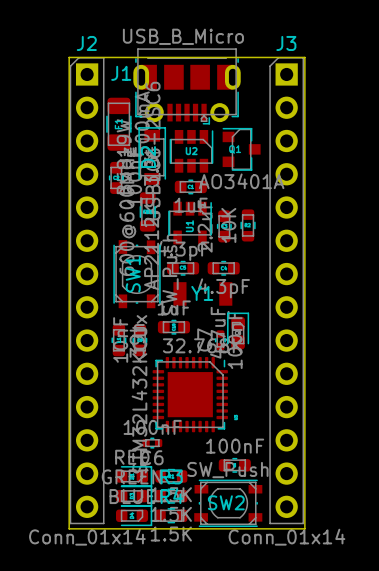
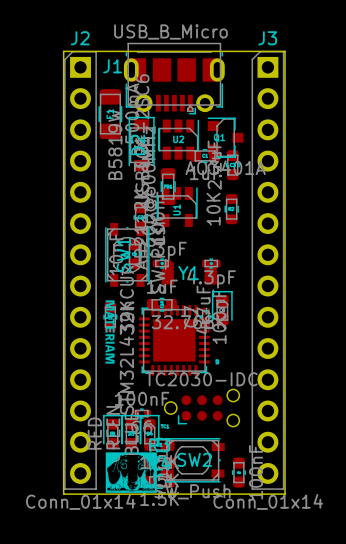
part position: (116, 177) -> (140, 217)
part position: (190, 186) -> (205, 155)
part position: (147, 211) -> (168, 186)
part position: (224, 226) -> (232, 165)
part footprint: [167, 260, 200, 276] -> [152, 258, 172, 269]
part footprint: [207, 260, 240, 276] -> [201, 258, 221, 269]
drawing: none -> [105, 300, 115, 364]
part position: (139, 340) -> (134, 254)
part position: (190, 394) -> (174, 340)
part: none -> TC2030-IDC (202, 408)
part rotation: 0° (234, 465) -> 90° clockwise (238, 472)
part position: (234, 465) -> (238, 472)
part rotation: 0° (134, 476) -> 90° counterclockwise (112, 431)
drawing: none -> [105, 452, 157, 493]
part rotation: 0° (134, 496) -> 90° counterclockwise (131, 431)
part position: (134, 496) -> (131, 431)
SW2 rotation: 0° (228, 503) -> 180° (192, 460)
part rotation: 0° (134, 515) -> 90° counterclockwise (149, 431)
part position: (134, 515) -> (149, 431)

